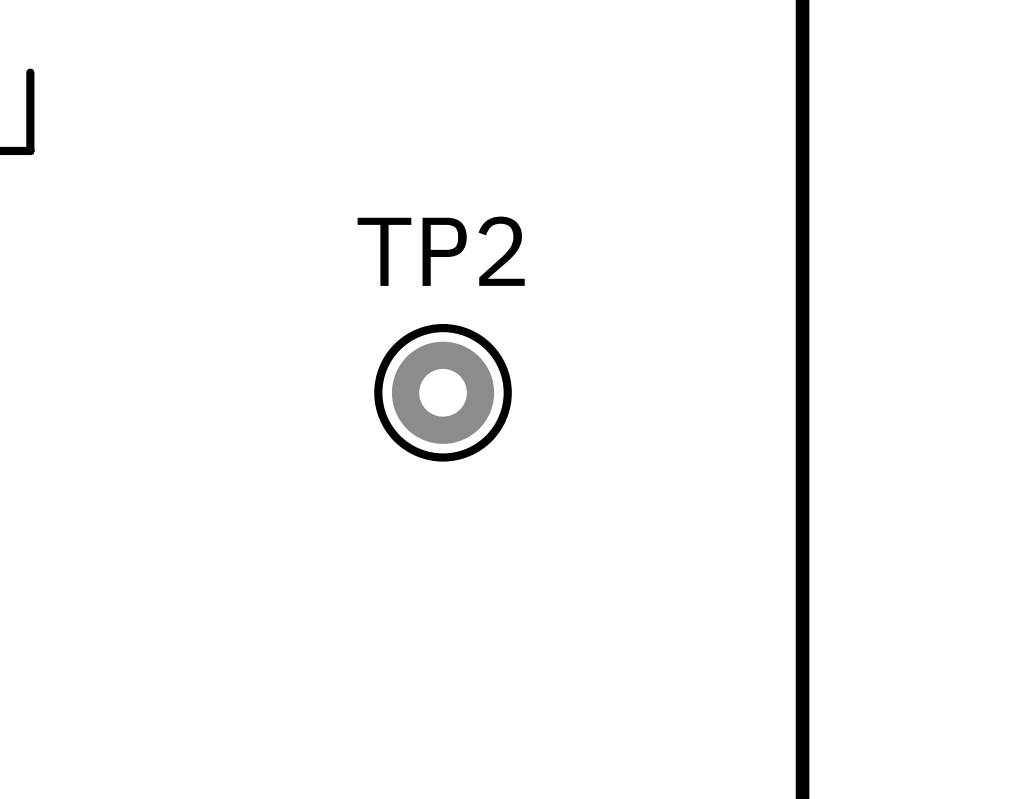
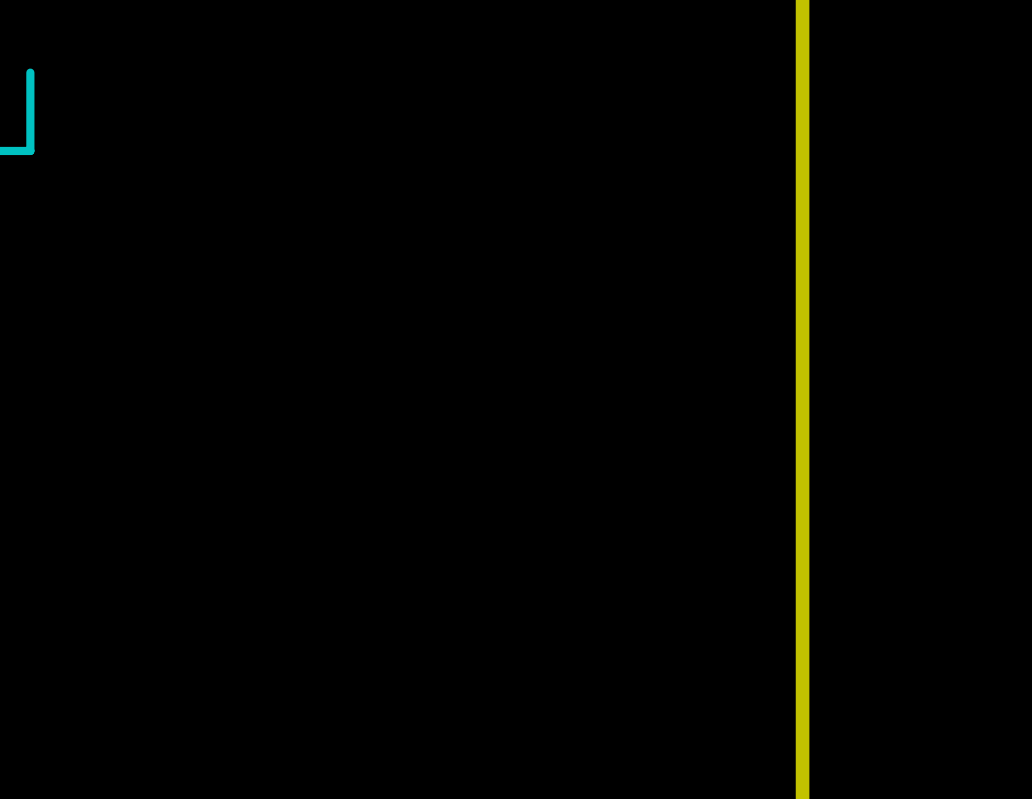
TP2: (443, 392) -> none

